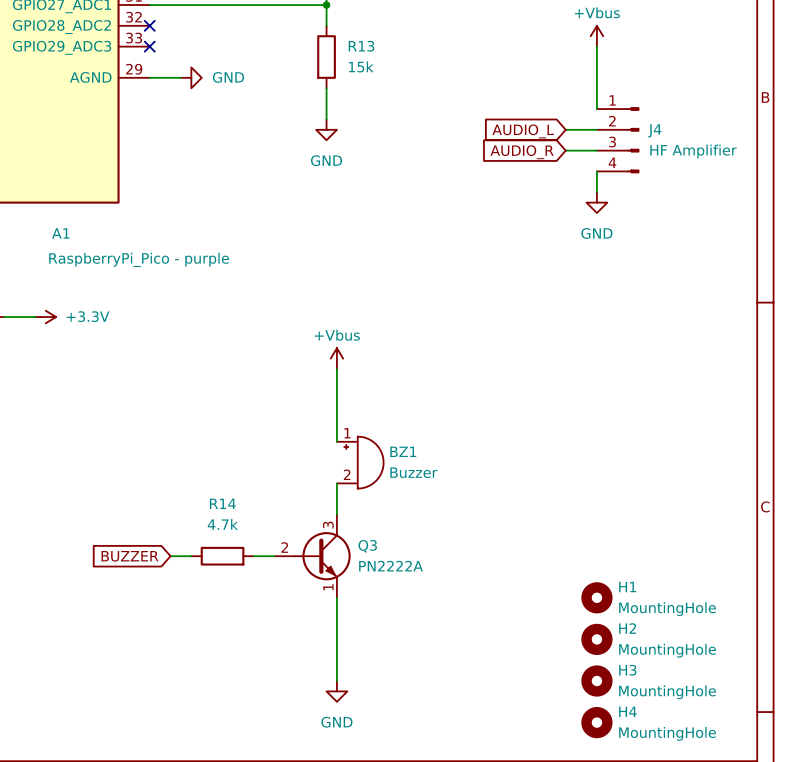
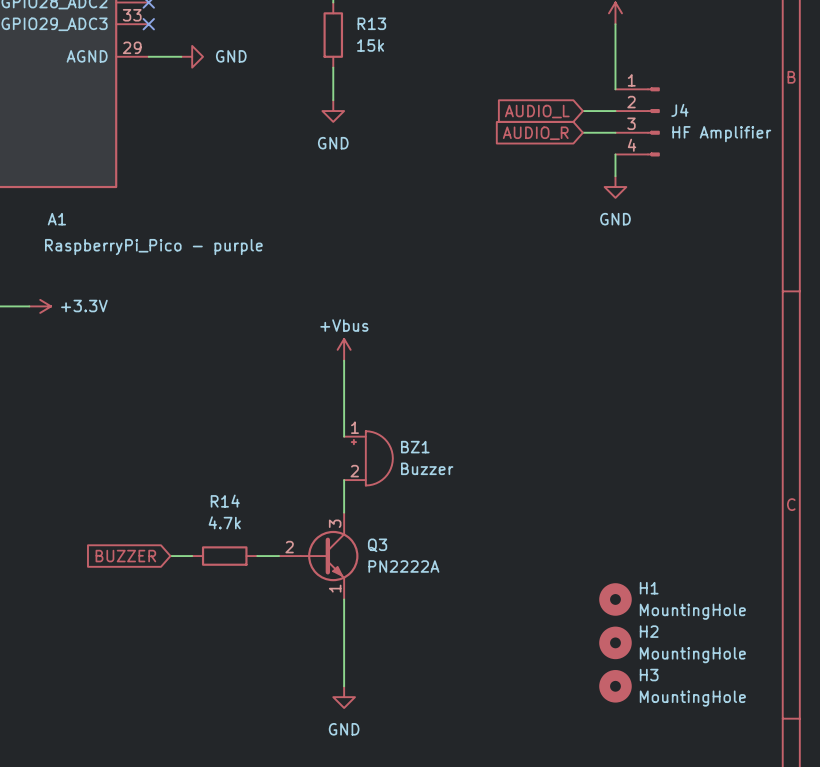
H4: MountingHole (596, 722) -> none

